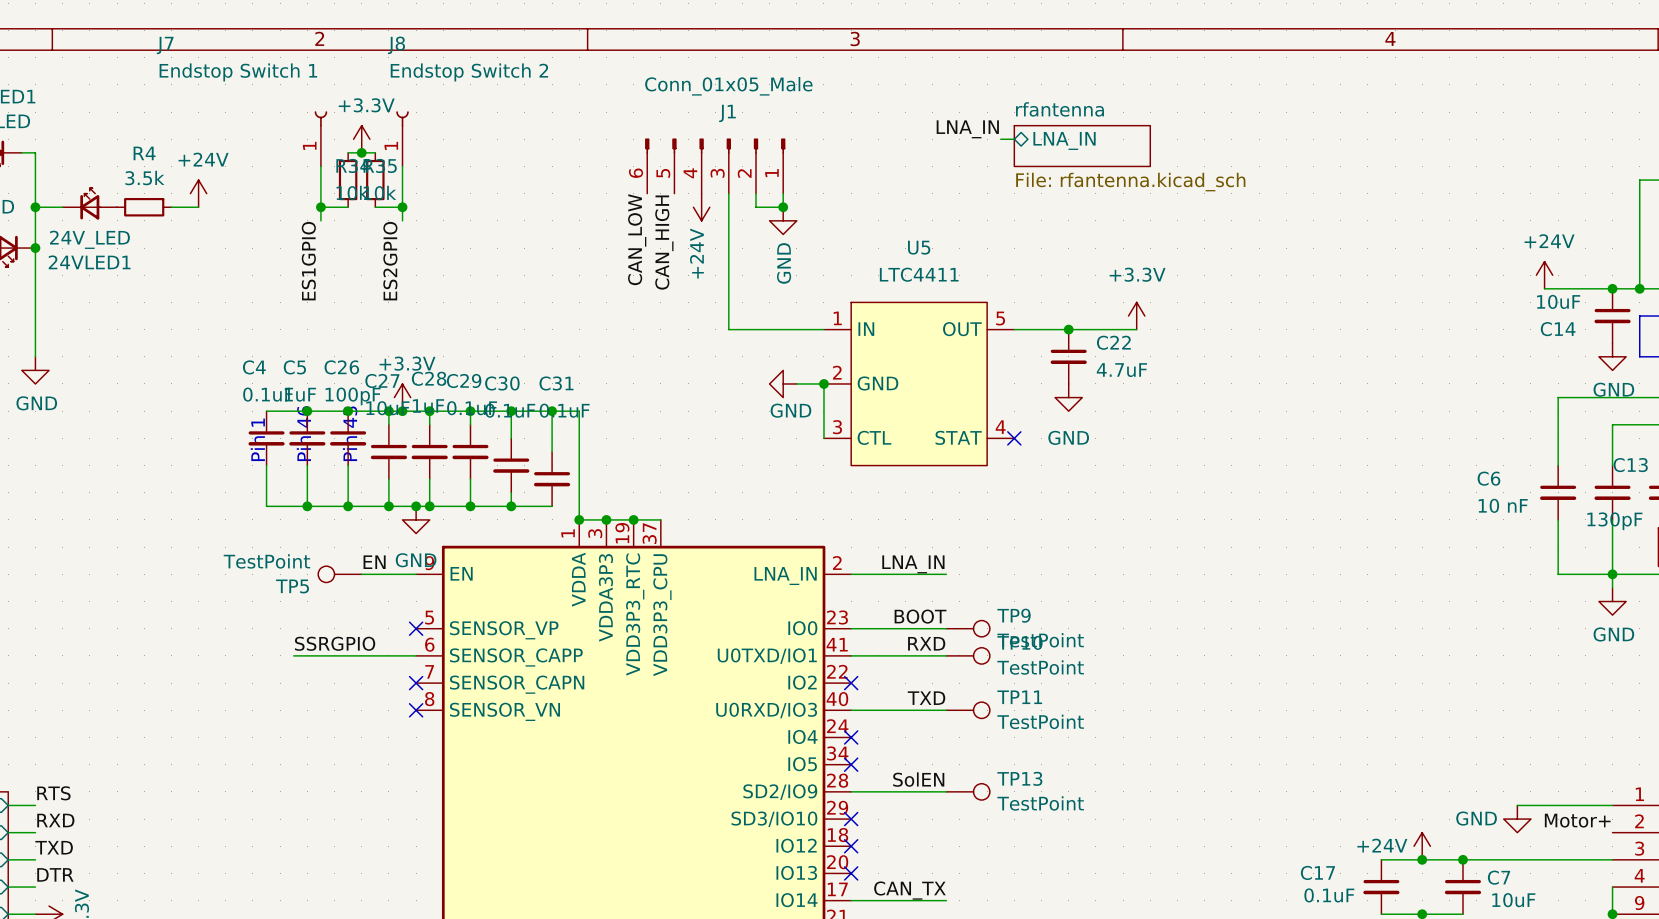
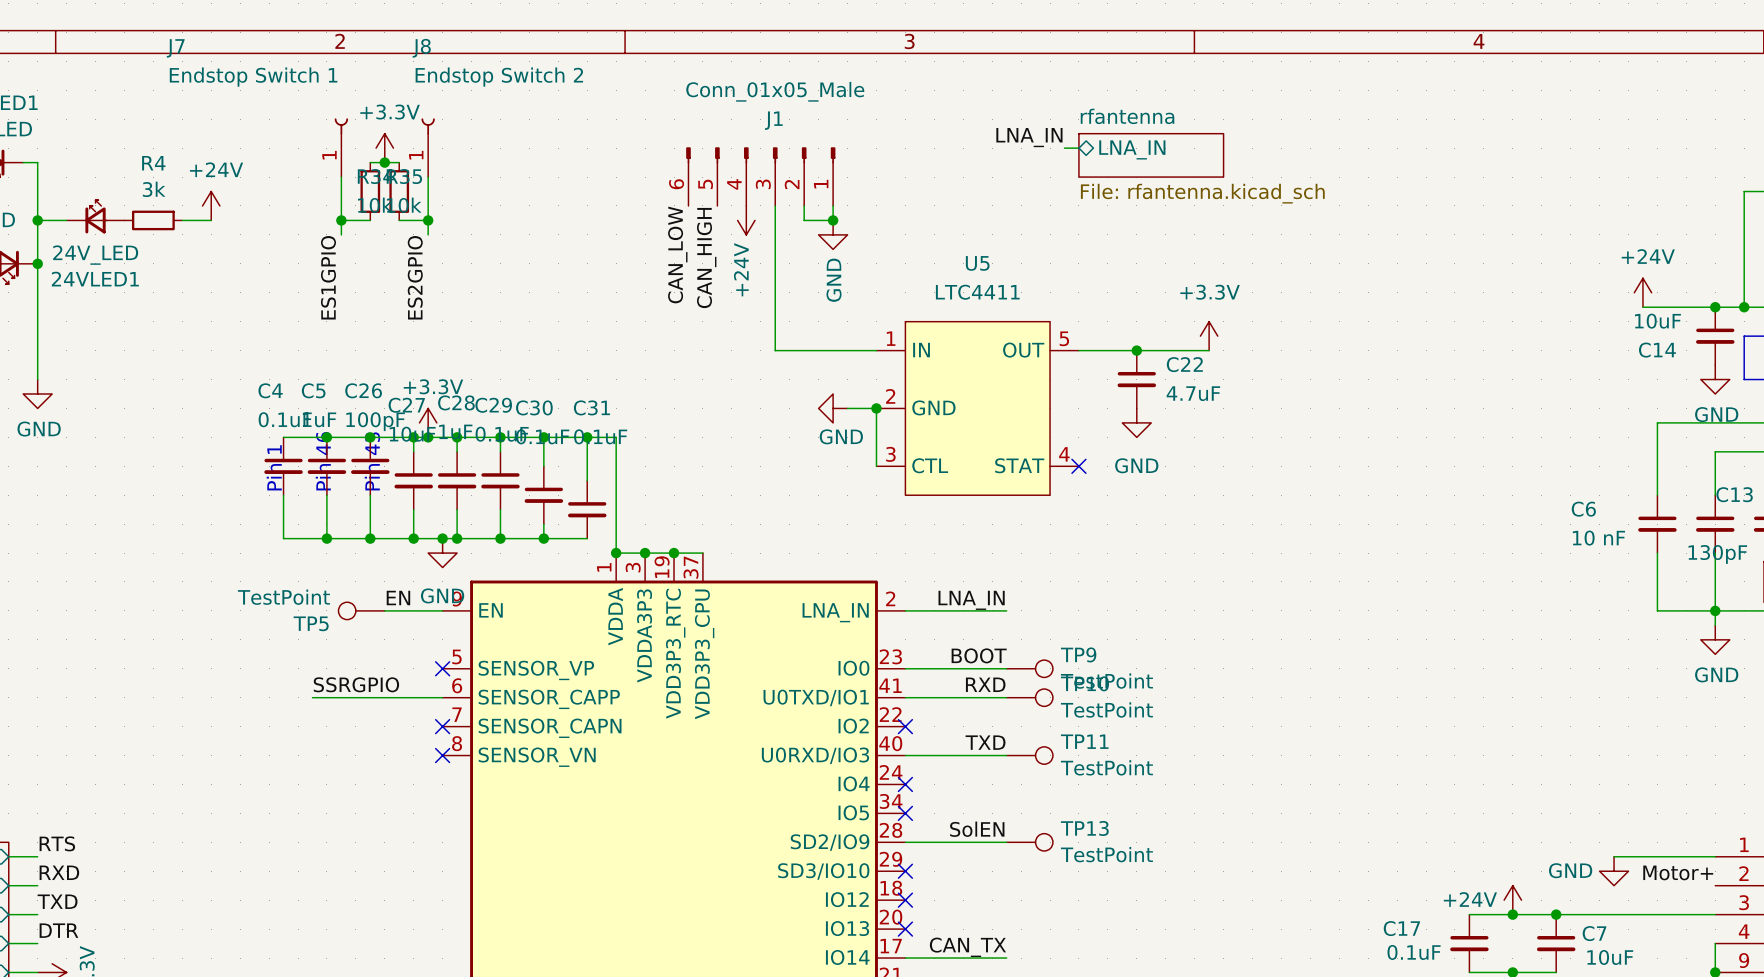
R4 value: 3.5k (144, 178) -> 3k (154, 189)

